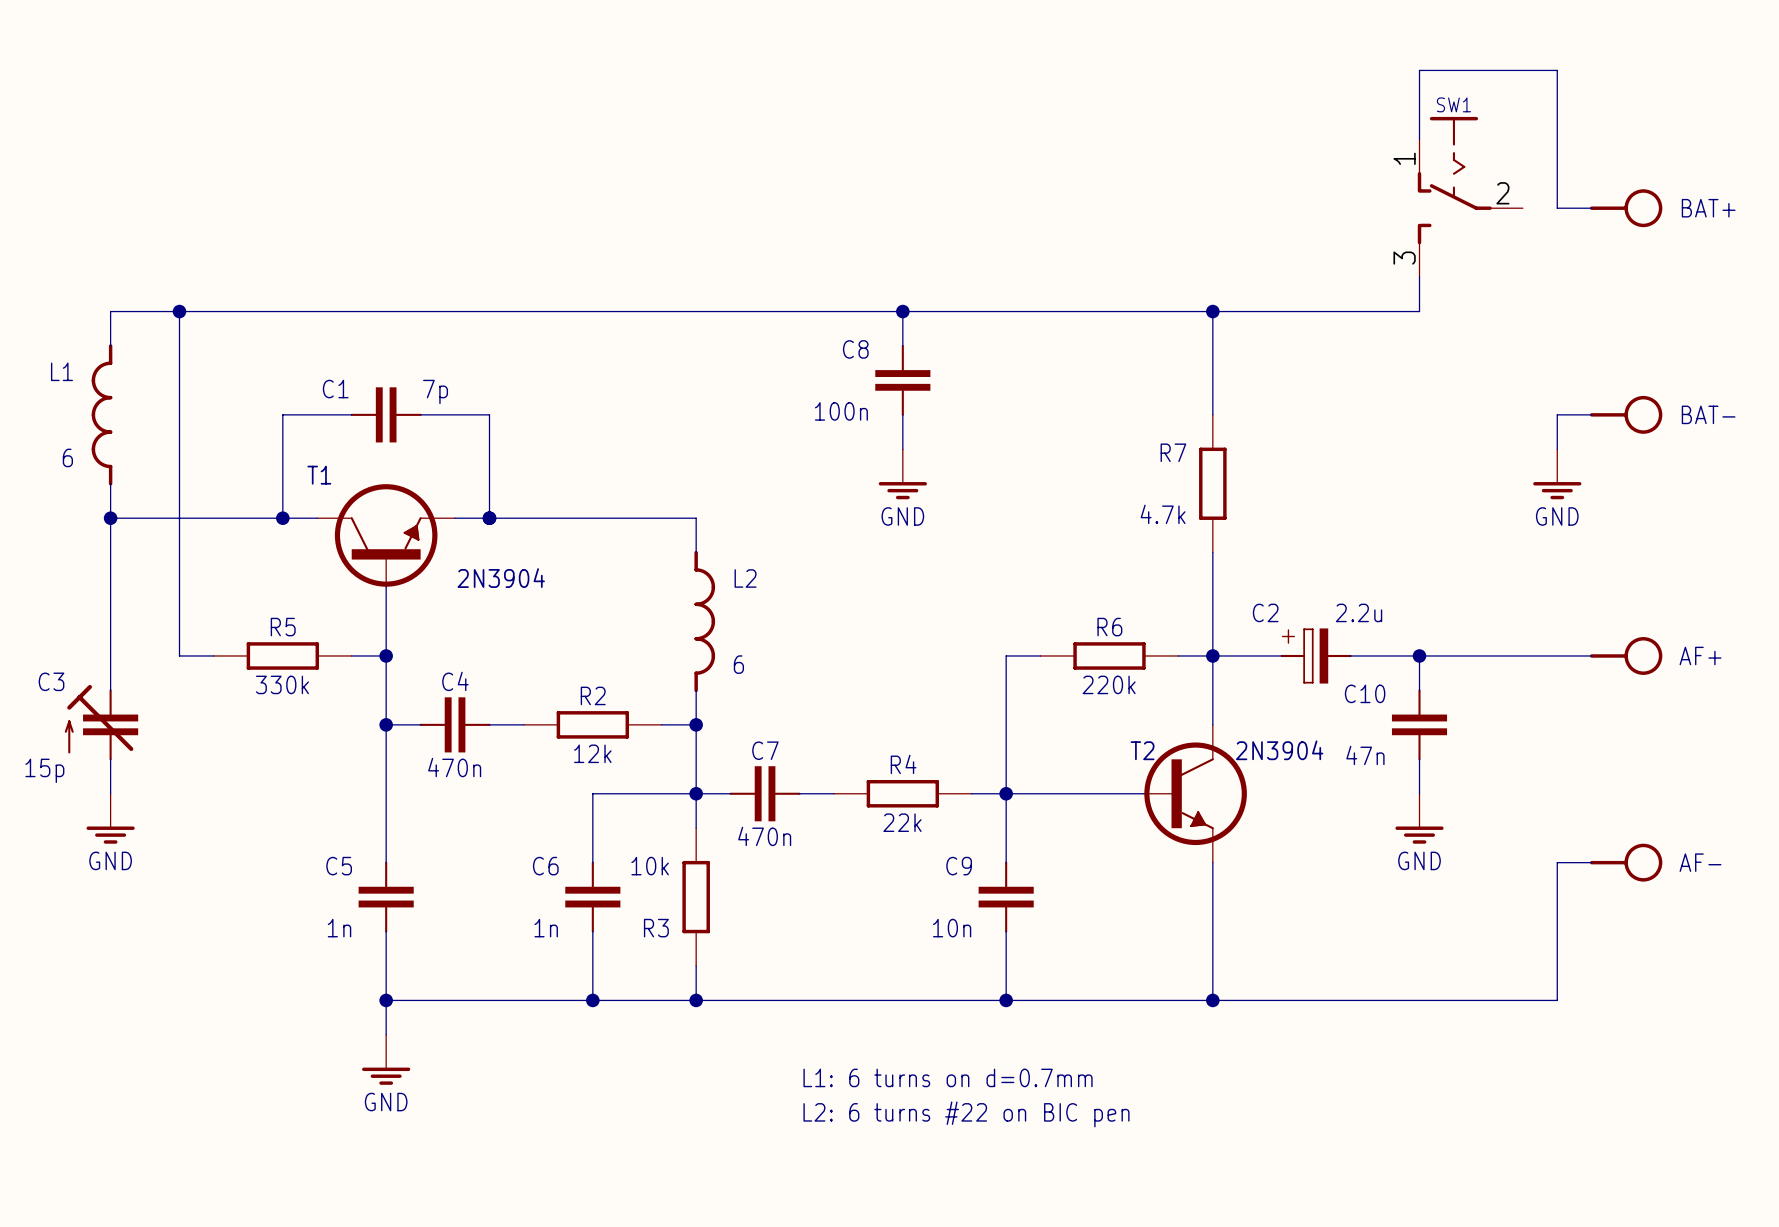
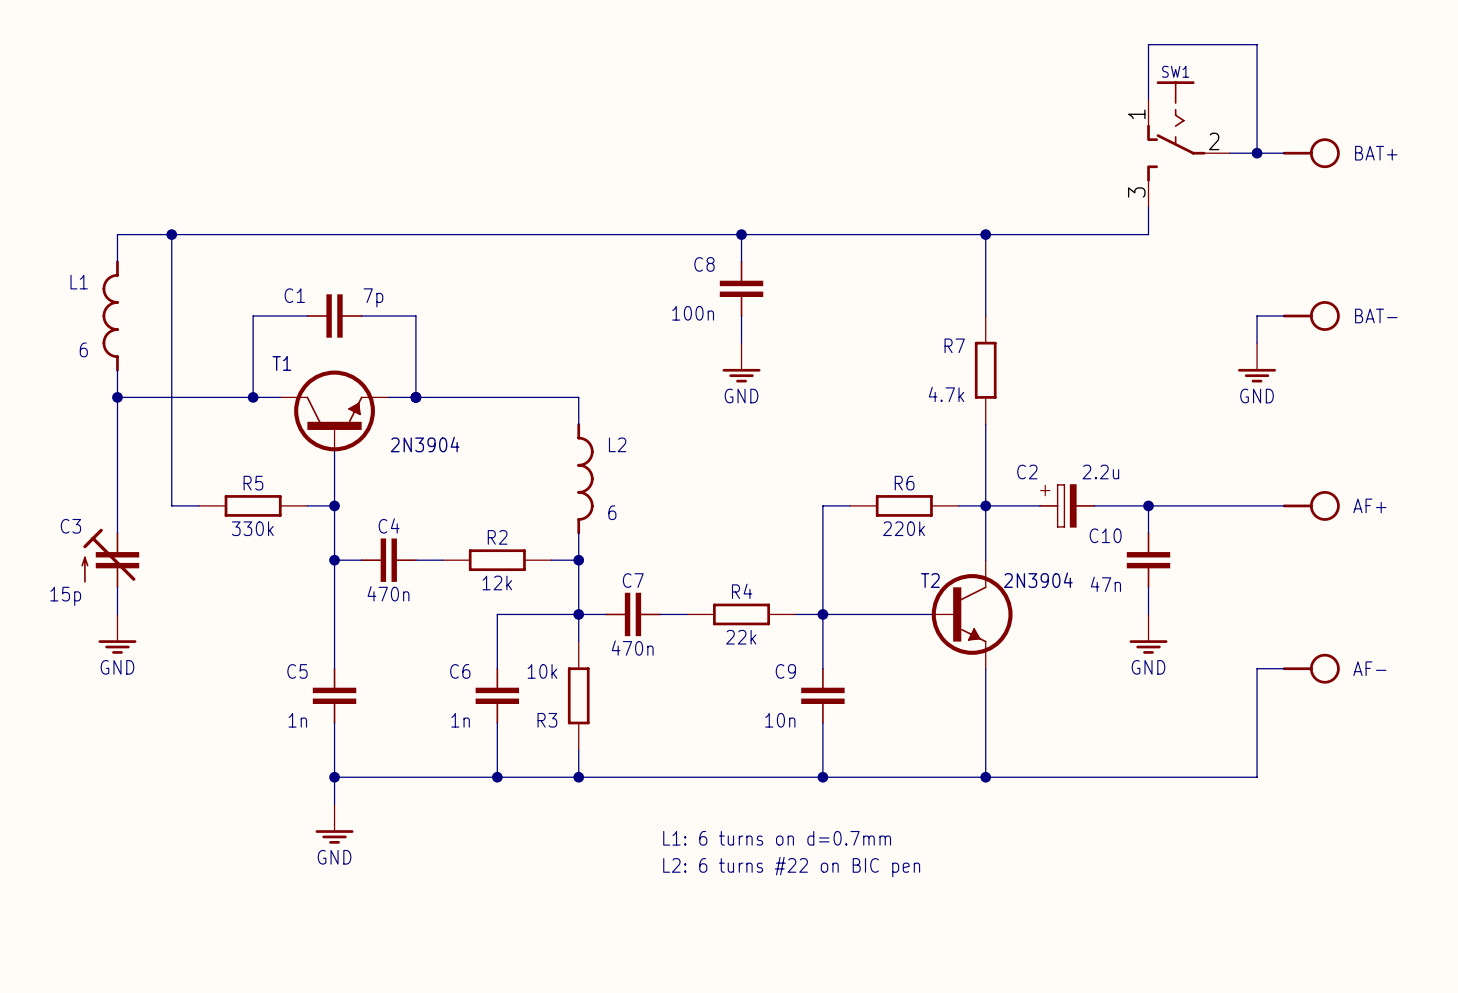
wire: none -> (1229, 153) (1257, 153)
junction: none -> (1257, 153)

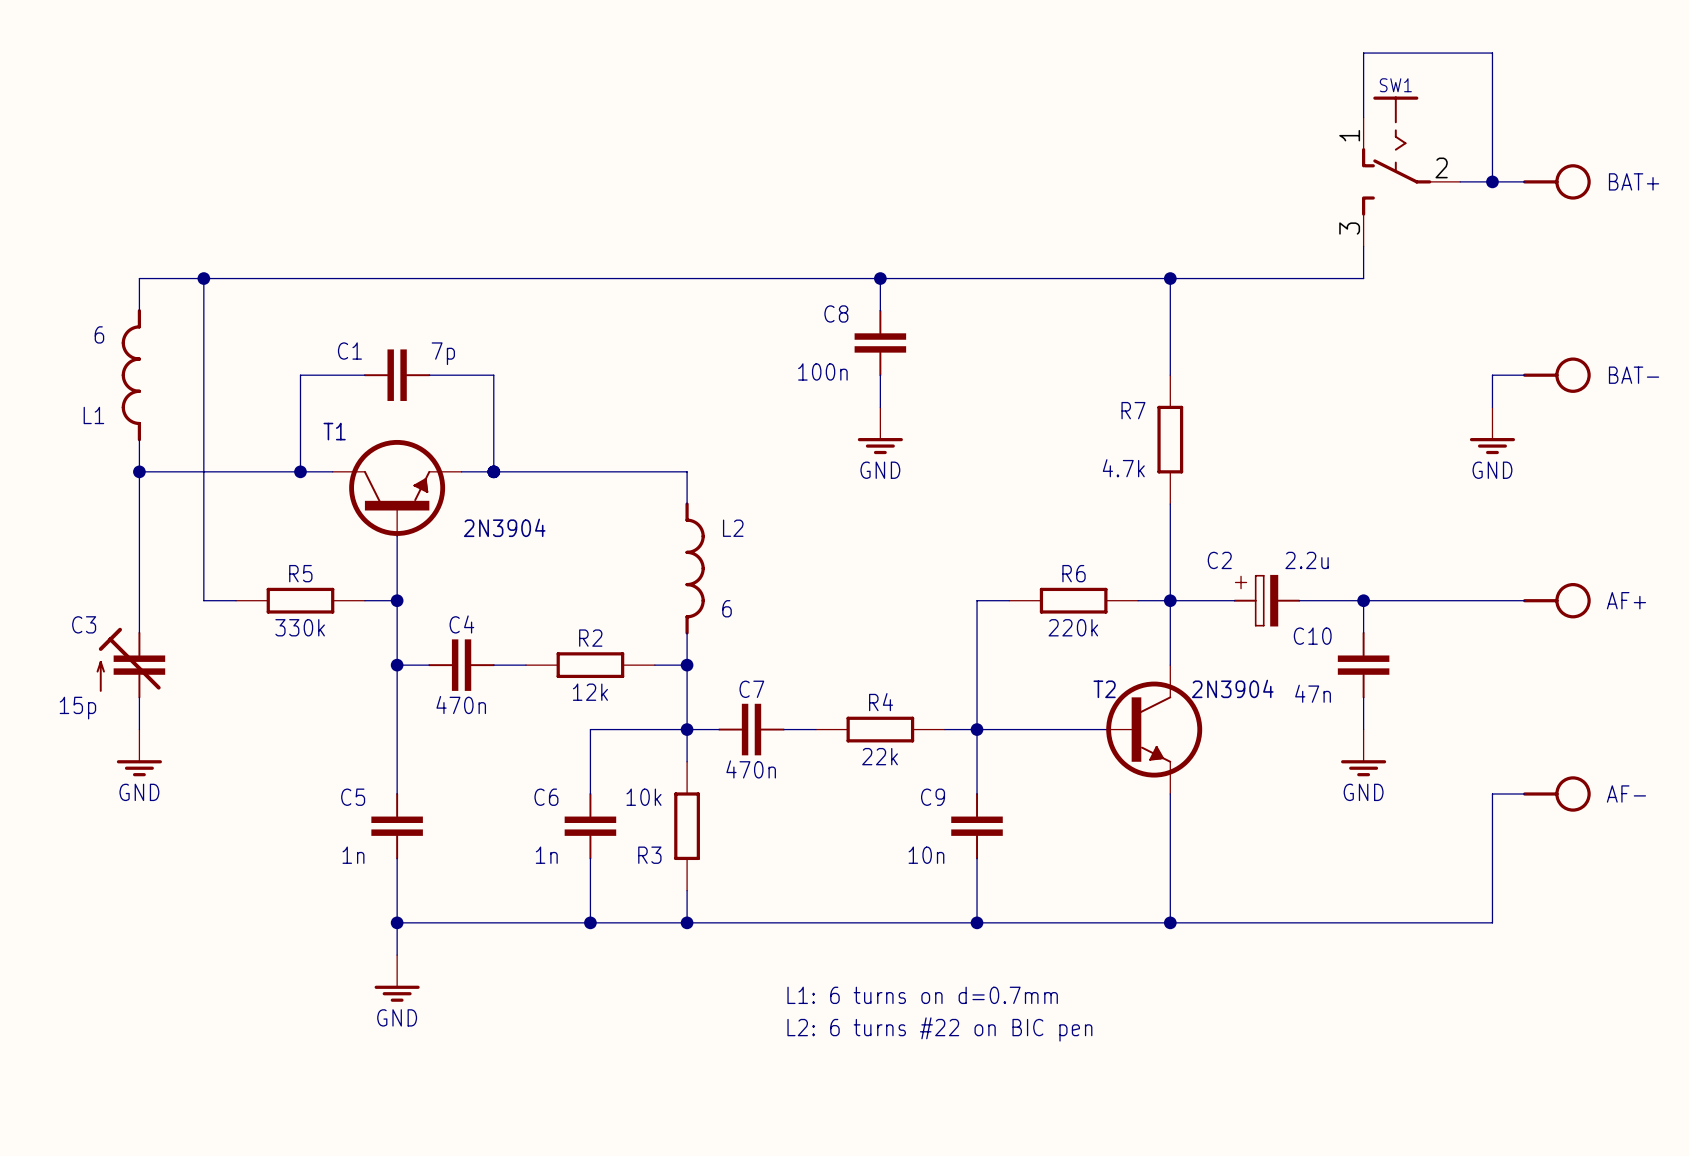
L1 name position: L1 (79, 282) -> L1 (93, 415)
L1 value position: 6 (83, 349) -> 6 (99, 334)

